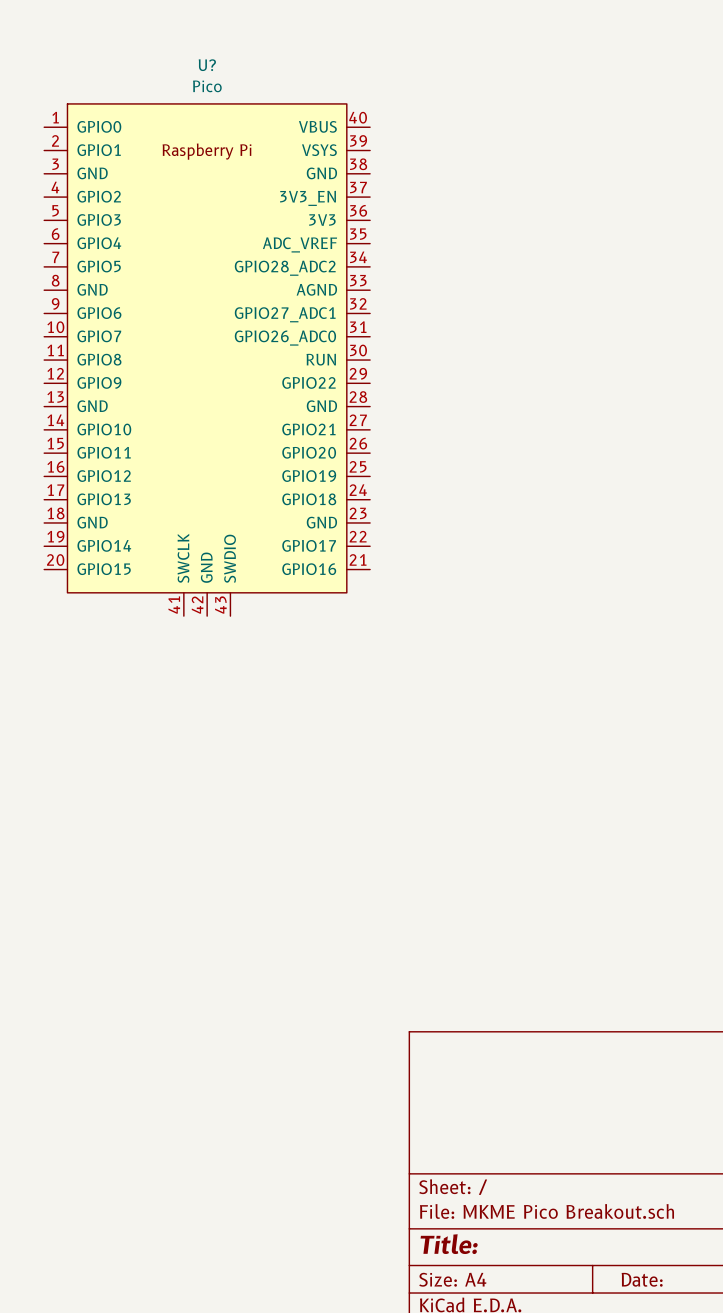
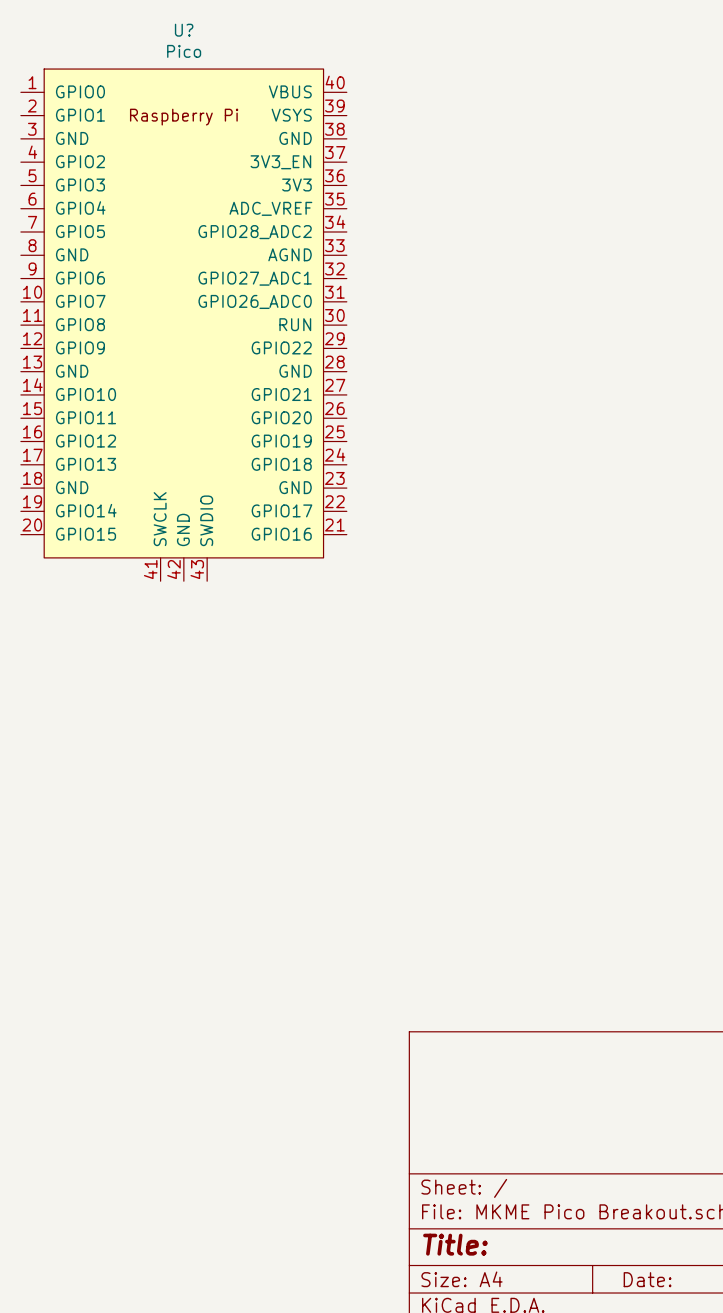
U? position: (207, 360) -> (183, 325)

